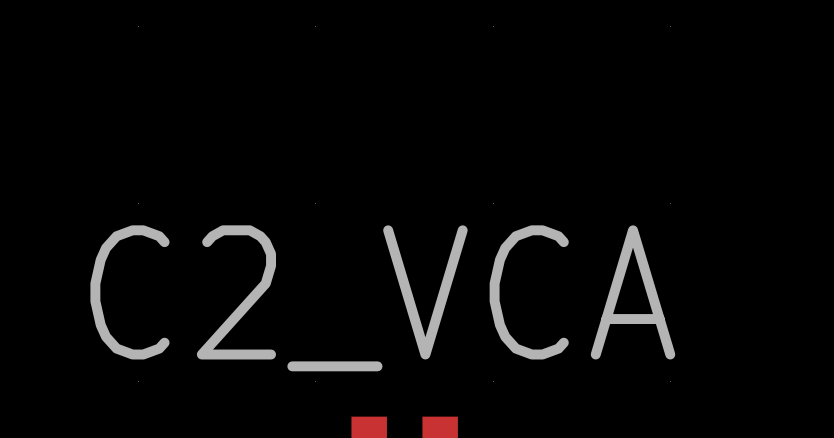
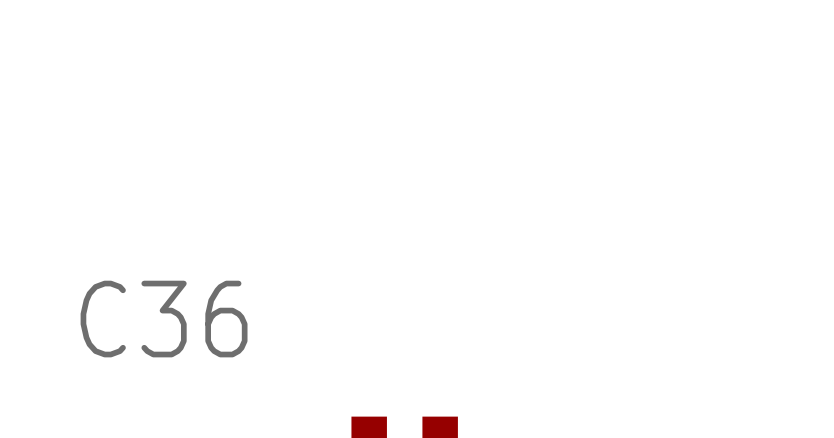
C2_VCA name: C2_VCA (382, 298) -> C36 (164, 319)

